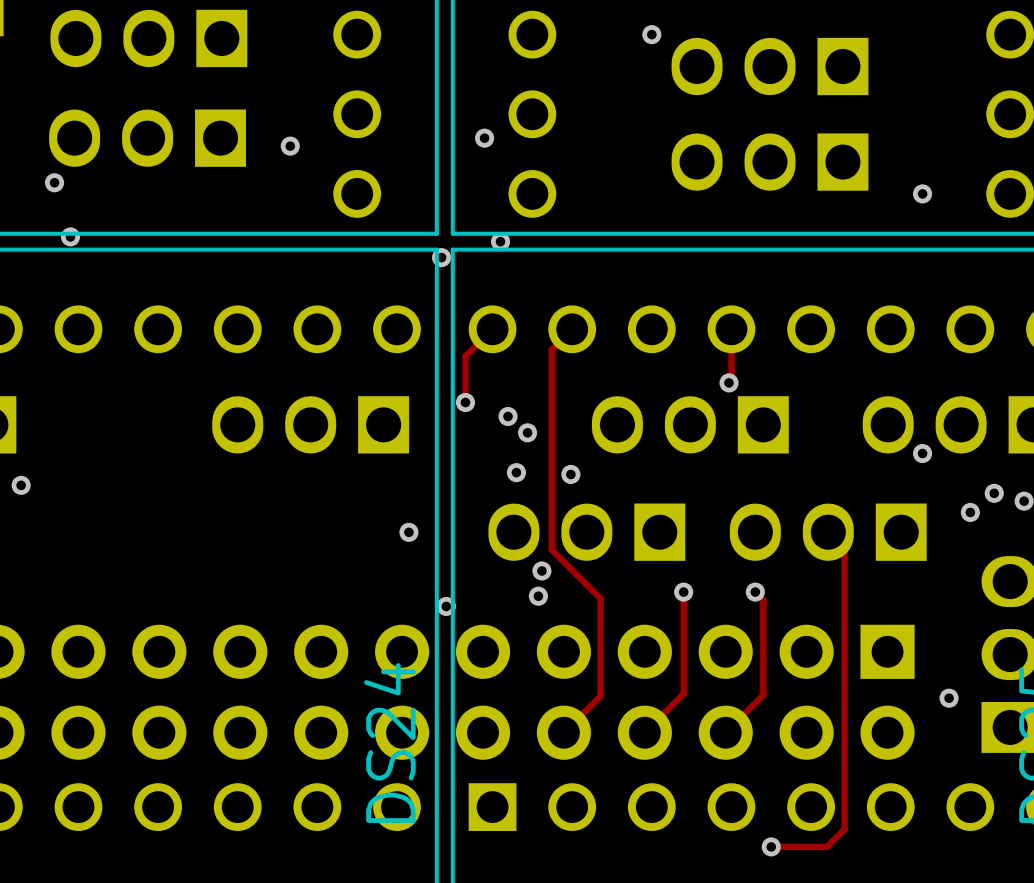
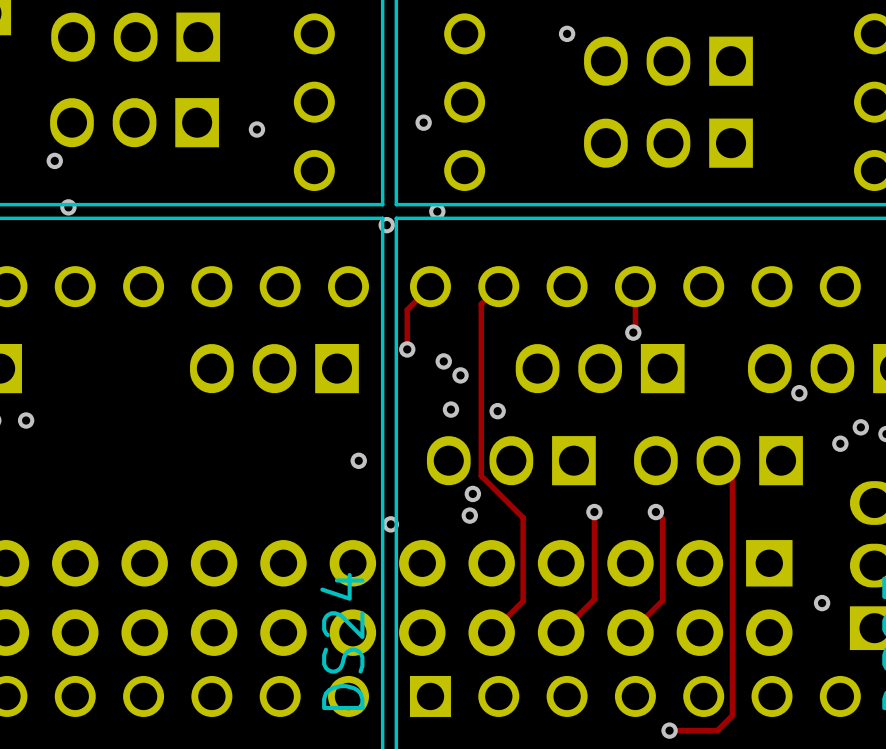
via: (922, 193) -> none

